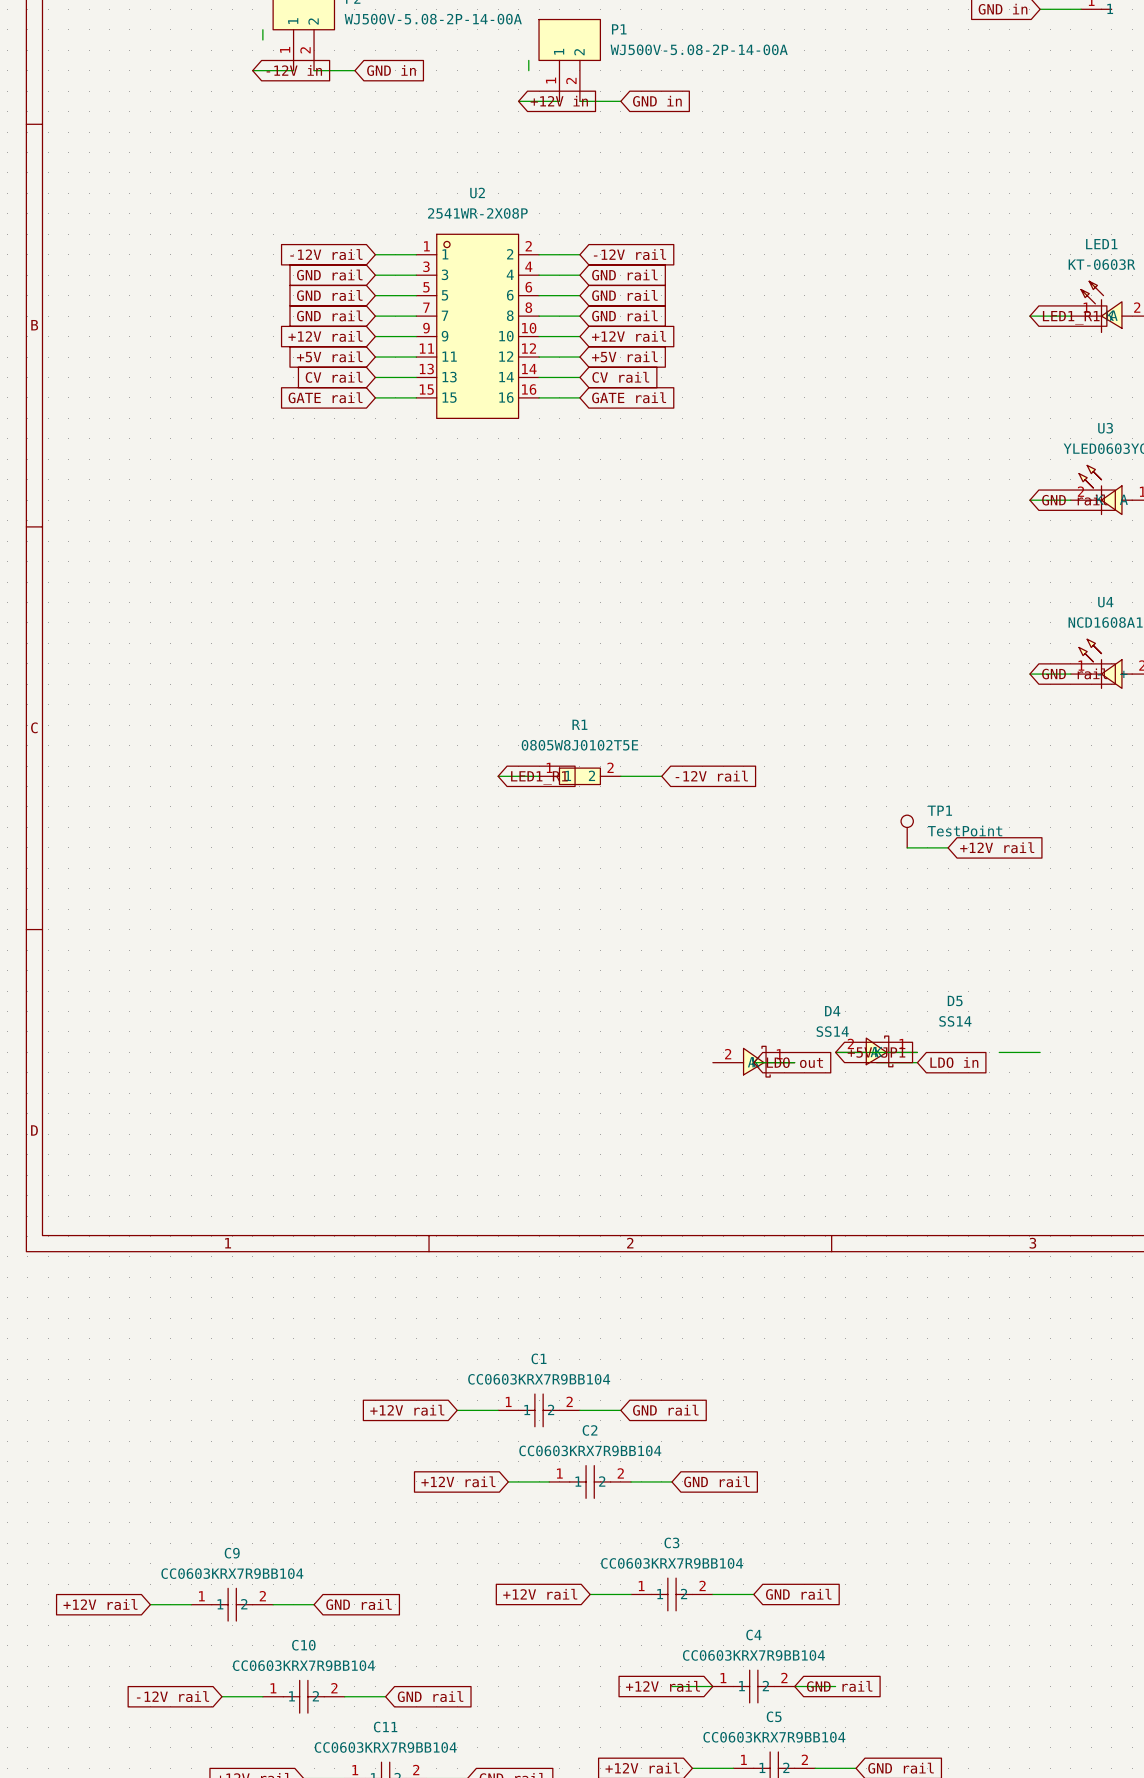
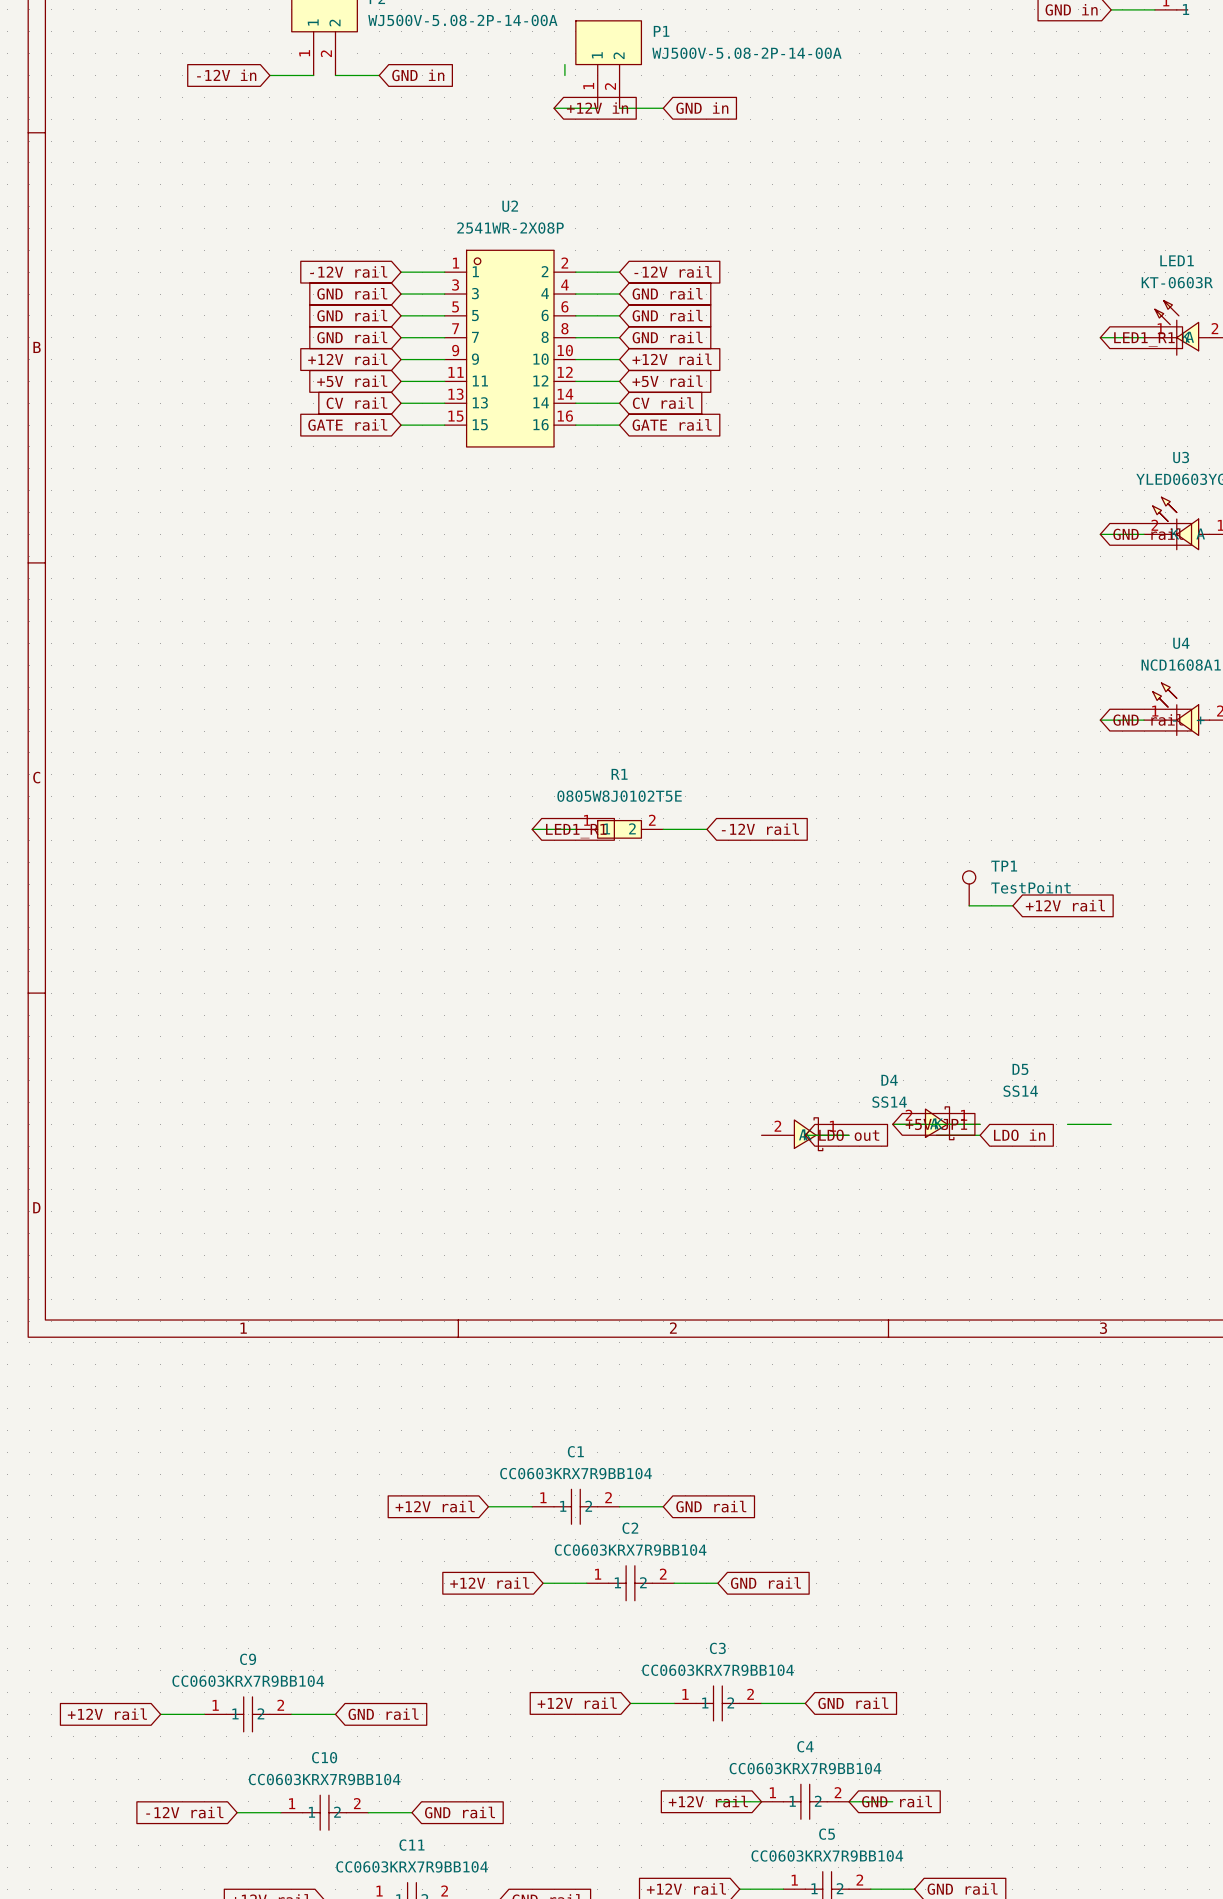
wire: (262, 29) (262, 39) -> none
global label rotation: 0° (294, 70) -> 180° (226, 75)

